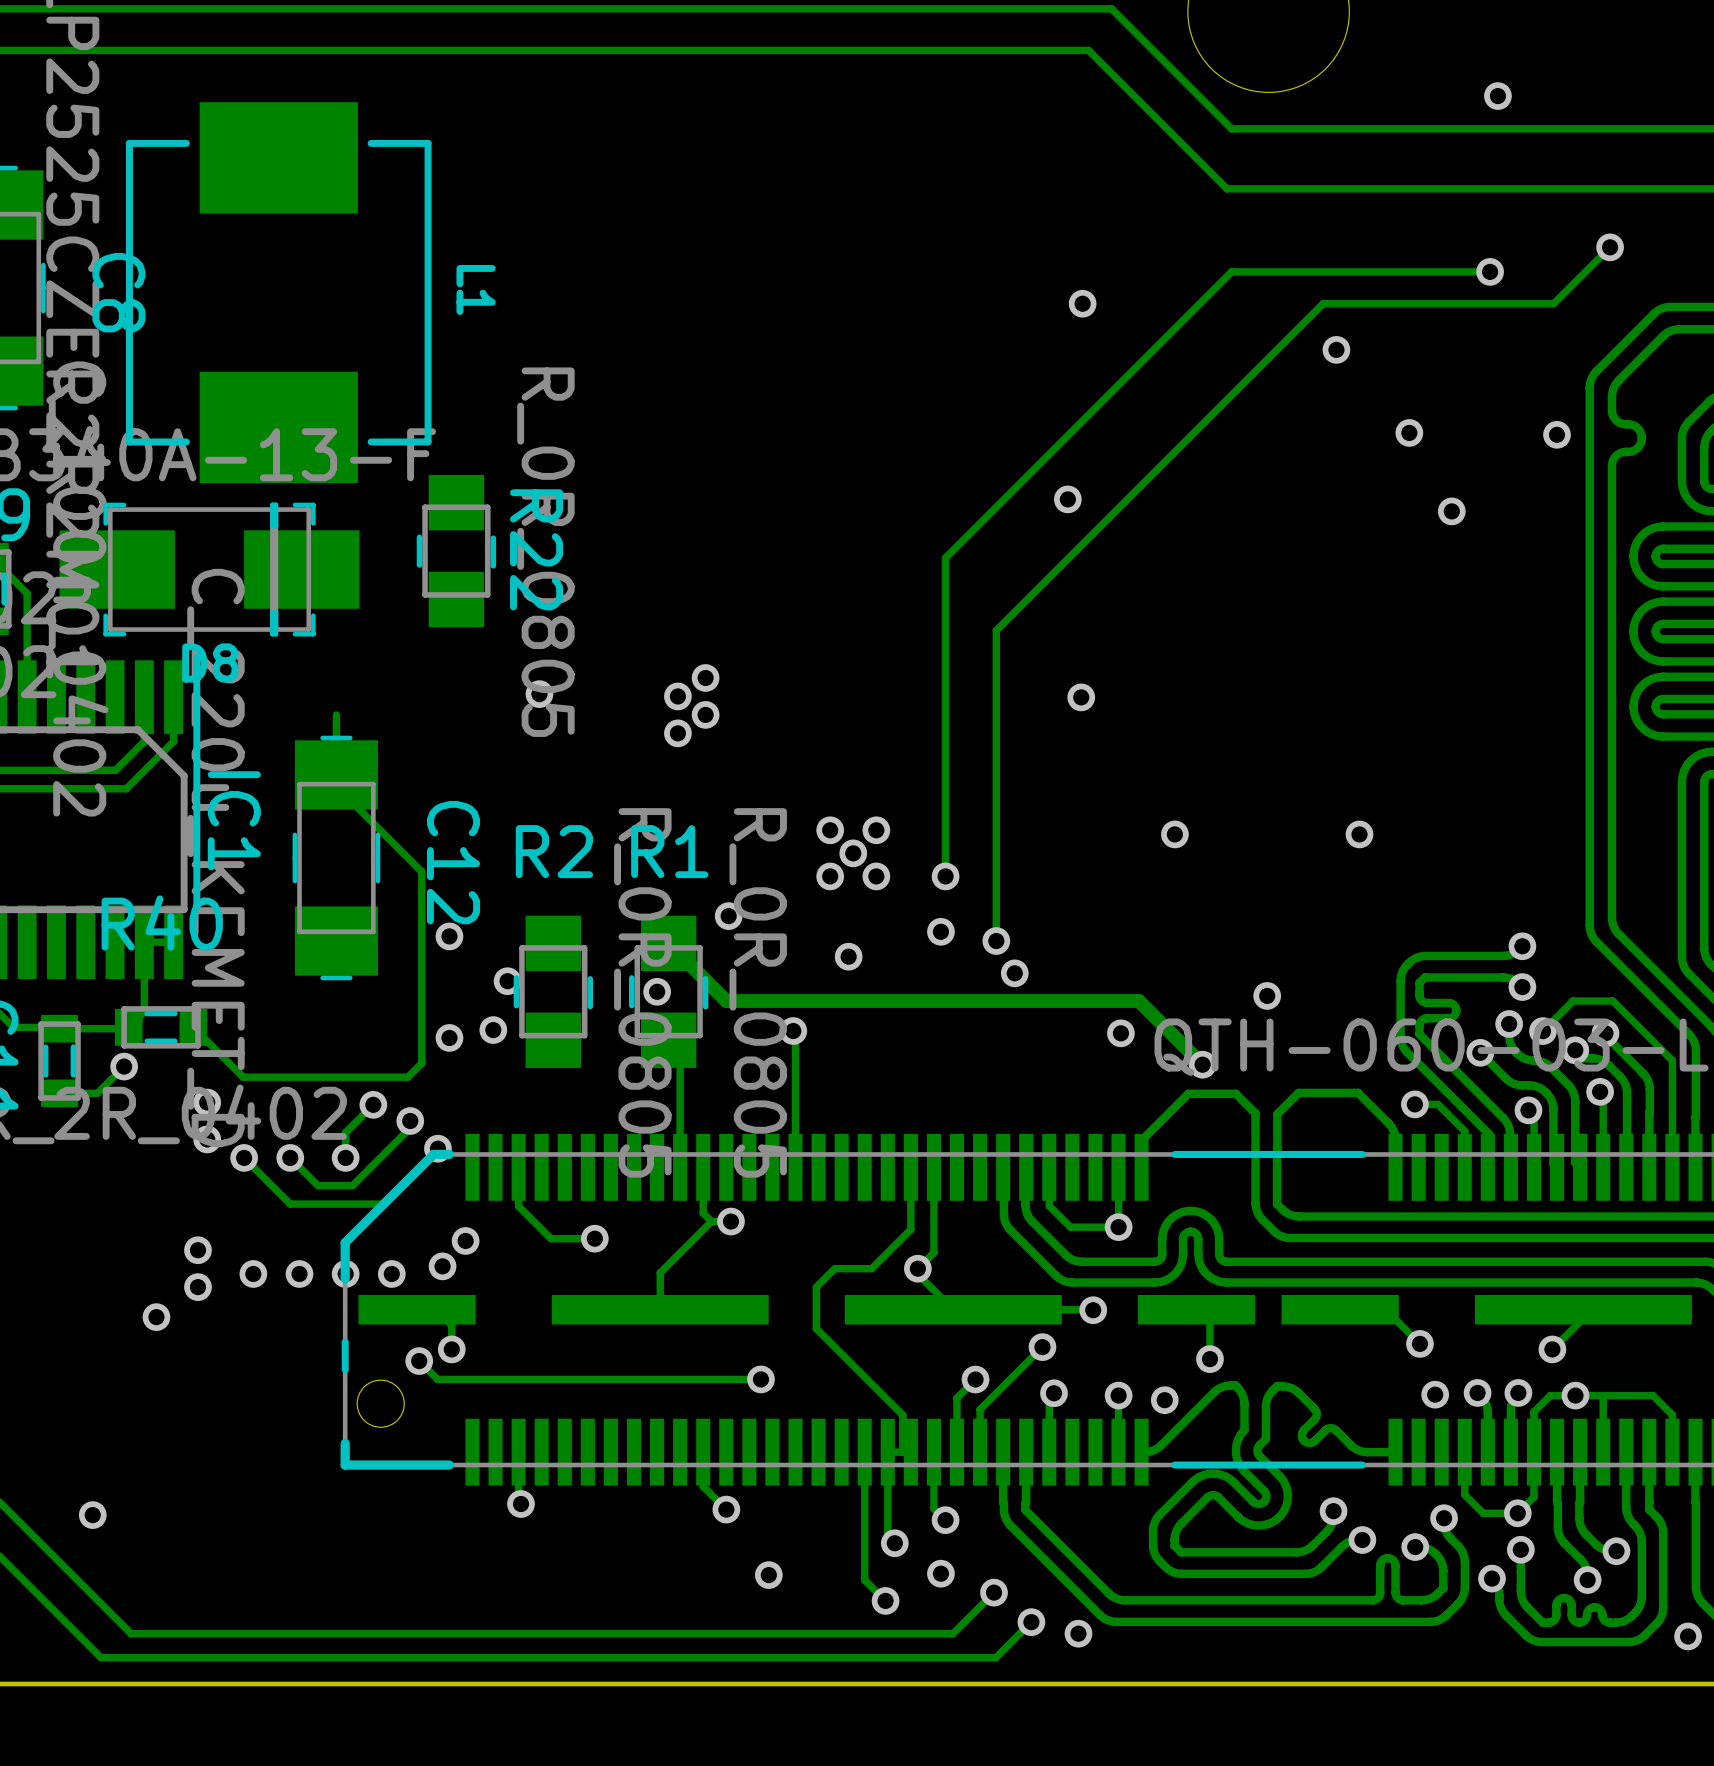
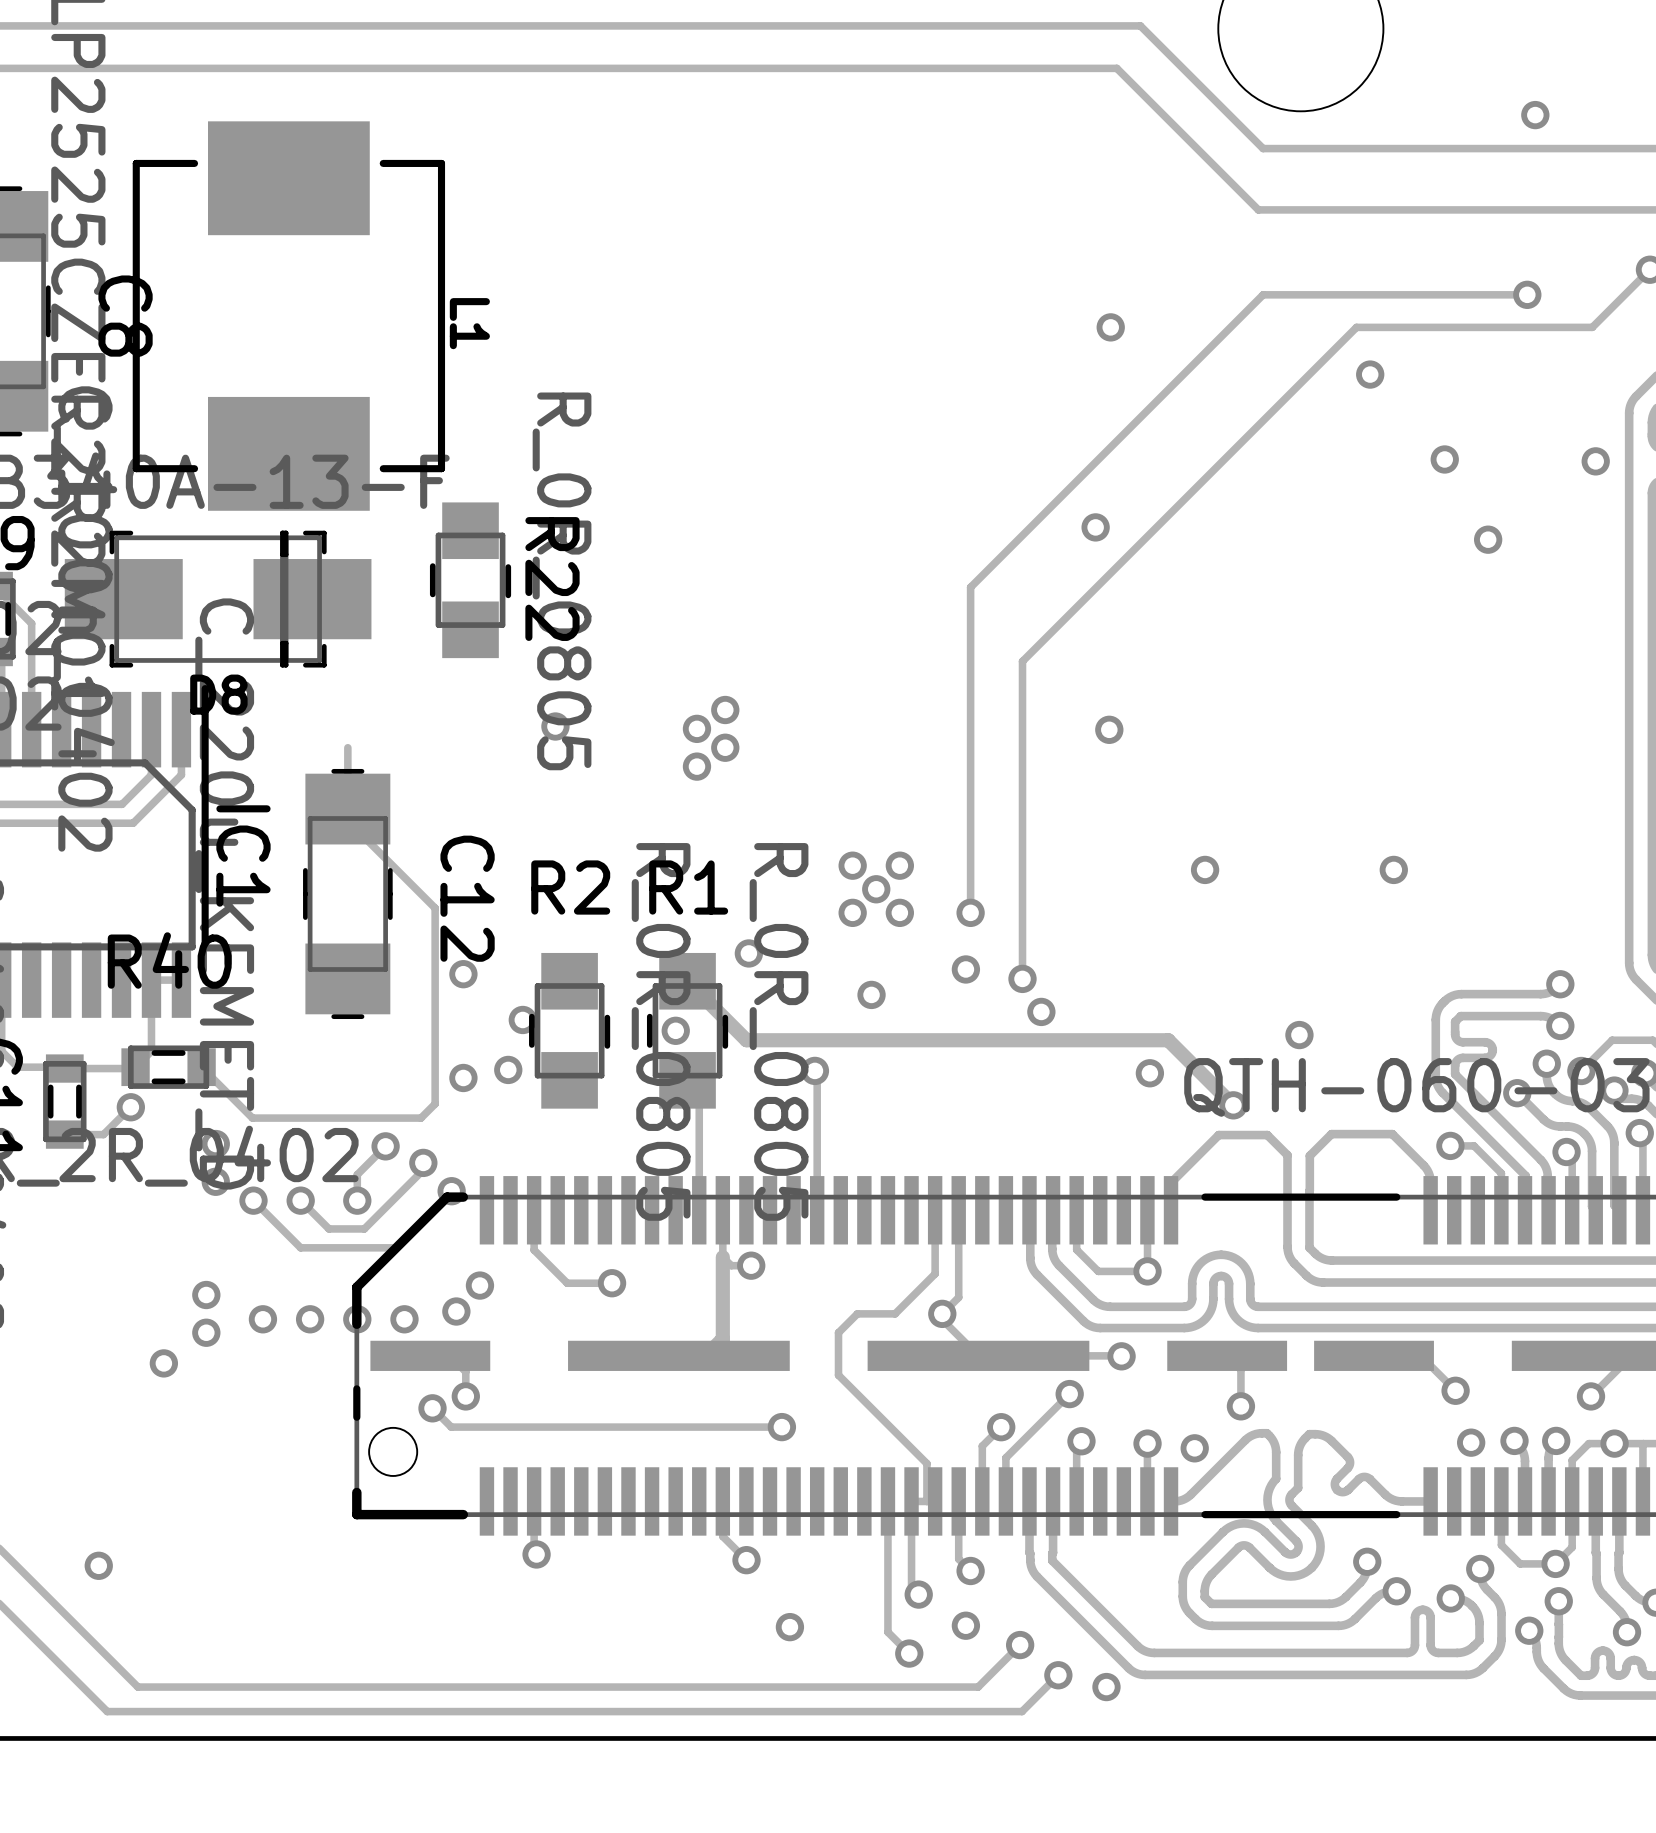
L1 name position: L1 (476, 289) -> L1 (469, 323)
track: (711, 1221) (660, 1272) (660, 1309) -> (722, 1257) (722, 1338) (705, 1355) (678, 1355)

